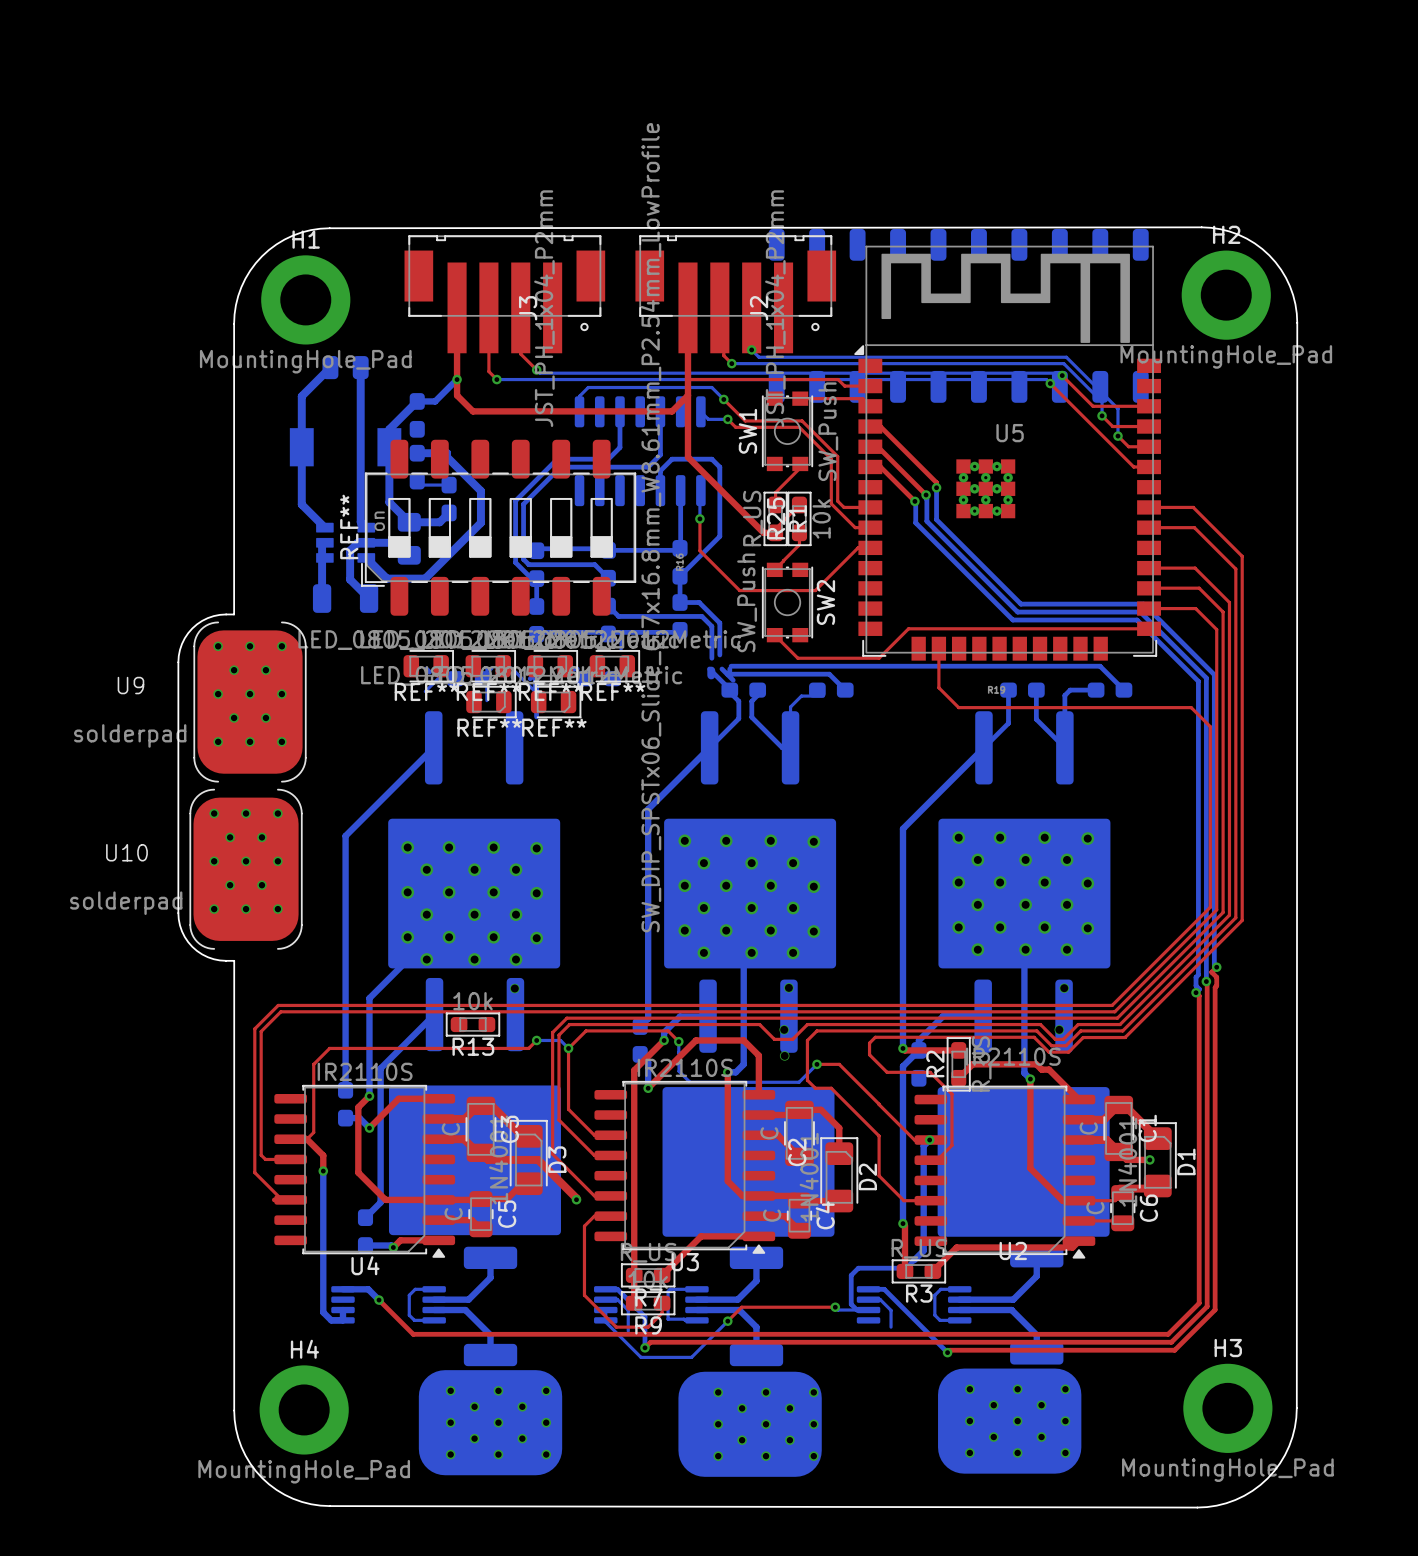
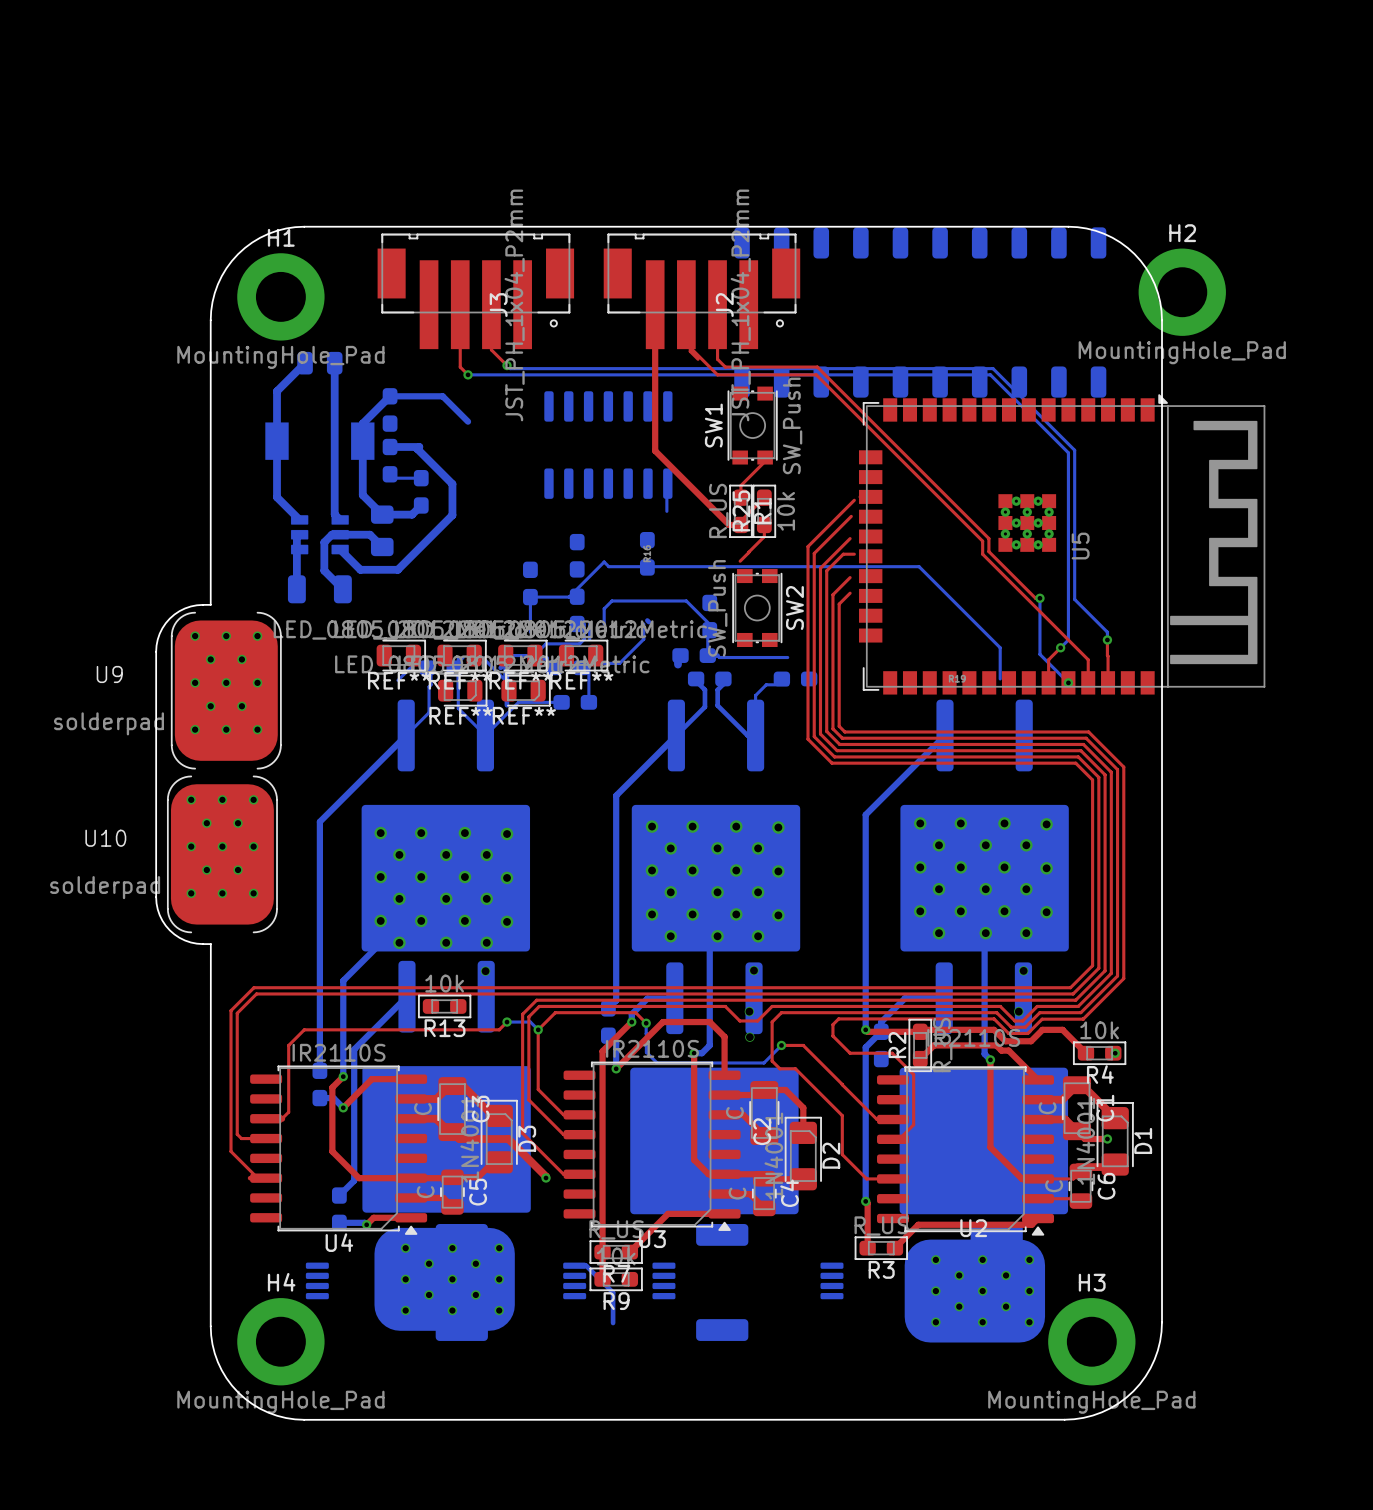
board edge: (329, 228) (1201, 227) (1220, 229) (1246, 238) (1262, 249) (1275, 262) (1285, 277) (1293, 295) (1297, 322) (1296, 1408) (1294, 1427) (1289, 1446) (1274, 1471) (1252, 1490) (1235, 1499) (1207, 1507) (329, 1506) (311, 1504) (293, 1498) (269, 1484) (255, 1471) (241, 1447) (234, 1419) (234, 960) -> (304, 226) (1068, 226) (1086, 228) (1104, 233) (1120, 242) (1140, 260) (1150, 276) (1157, 293) (1162, 320) (1162, 1322) (1160, 1341) (1154, 1359) (1139, 1384) (1118, 1403) (1092, 1415) (1074, 1419) (304, 1419) (286, 1418) (268, 1412) (244, 1398) (226, 1378) (214, 1353) (211, 1335) (210, 944)
top track: (457, 307) (457, 395) (472, 411) (672, 411) (687, 395) -> none
top track: none -> (717, 304) (717, 359) (725, 367) (817, 367) (988, 538) (988, 551) (1035, 598) (1039, 598)
bottom track: (751, 349) (759, 357) (1066, 357) (1117, 408) (1117, 436) -> none
via: (751, 349) -> none
bottom track: (731, 363) (1063, 363) (1102, 401) (1102, 415) -> none
via: (731, 363) -> none
bottom track: (1033, 373) (1059, 373) (1062, 375) -> (993, 368) (1074, 450) (1074, 599) (1107, 632) (1107, 639)
top track: (1062, 375) (1092, 406) (1149, 406) -> none
via: (1062, 375) -> none
bottom track: (457, 379) (435, 401) -> (468, 421) (442, 396) (407, 396)
via: (457, 379) -> none
top track: (687, 379) (751, 379) -> (686, 343) (717, 374)
top track: (838, 379) (844, 386) (870, 386) -> (802, 374) (816, 374) (982, 541) (982, 554) (1088, 659) (1088, 682)
bottom track: (1030, 379) (1046, 379) (1050, 383) -> (990, 374) (1068, 452) (1068, 639) (1060, 647)
top track: (1050, 383) (1133, 466) (1149, 466) -> none
via: (1050, 383) -> none
top track: (800, 398) (862, 398) (870, 406) -> none
top track: (723, 399) (745, 420) (802, 420) (837, 456) (837, 501) (843, 507) (870, 507) -> none
bottom track: (723, 399) (711, 387) (588, 387) (579, 396) (579, 411) -> none
via: (723, 399) -> none
bottom track: (619, 411) (619, 447) (608, 459) (557, 459) (515, 500) (515, 562) (531, 578) (536, 578) (536, 606) -> none
bottom track: (660, 411) (660, 454) (648, 467) (560, 467) (523, 504) (523, 559) (528, 564) (594, 564) (608, 578) (608, 606) (618, 616) (701, 616) (711, 626) (711, 658) -> none
bottom track: (700, 411) (708, 419) (727, 419) -> none
top track: (1102, 415) (1112, 426) (1149, 426) -> none
via: (1102, 415) -> none
top track: (727, 419) (735, 427) (799, 427) (831, 459) (831, 503) (855, 527) (870, 527) -> none
via: (727, 419) -> none
top track: (870, 426) (880, 426) (936, 482) (936, 487) -> none
top track: (1117, 436) (1128, 446) (1149, 446) -> none
via: (1117, 436) -> none
top track: (870, 446) (877, 446) (926, 495) -> none
U5 rotation: 0° (1007, 453) -> 90° clockwise (1062, 544)
top track: (870, 466) (880, 466) (914, 501) -> none
bottom track: (936, 487) (936, 519) (1020, 604) (1143, 604) (1214, 674) (1214, 964) (1216, 967) -> none
via: (936, 487) -> none
bottom track: (660, 490) (660, 470) (672, 459) (711, 459) (719, 467) (719, 536) (680, 576) (680, 602) (699, 602) (719, 623) (719, 654) -> none
bottom track: (680, 490) (681, 550) (538, 548) -> none
via: (926, 495) -> none
bottom track: (925, 498) (926, 521) (1017, 612) (1140, 612) (1206, 678) (1206, 981) -> none
bottom track: (914, 501) (915, 522) (1012, 620) (1137, 620) (1198, 681) (1198, 974) (1196, 977) (1196, 985) (1199, 989) (1196, 992) -> none
via: (914, 501) -> none
top track: (1149, 507) (1193, 507) (1242, 556) (1242, 920) (1166, 996) -> (850, 593) (839, 604) (839, 726) (844, 731) (1088, 731) (1123, 767) (1123, 978)
top track: (699, 518) (699, 550) (739, 590) (815, 590) (858, 547) (870, 547) -> none
via: (699, 518) -> none
REF**: SW_DIP_SPSTx06_Slide_6.7x16.8mm_W8.61mm_P2.54mm_LowProfile (498, 527) -> none
top track: (1149, 527) (1194, 527) (1235, 569) (1235, 917) (1160, 993) -> (850, 577) (832, 594) (832, 728) (842, 738) (1086, 738) (1117, 769) (1117, 975)
part: (536, 564) -> none
top track: (1149, 568) (1195, 568) (1229, 602) (1229, 915) (1153, 990) -> (854, 554) (843, 554) (826, 570) (826, 731) (839, 744) (1083, 744) (1111, 772) (1111, 973)
top track: (1149, 588) (1199, 588) (1223, 612) (1223, 912) (1147, 988) -> (850, 538) (820, 568) (820, 734) (837, 750) (1080, 750) (1105, 774) (1105, 970)
part: none -> (530, 583)
SW2 position: (787, 602) -> (757, 608)
bottom track: none -> (1039, 598) (1039, 654) (1068, 682)
via: none -> (1039, 598)
top track: (1149, 608) (1195, 608) (1216, 629) (1216, 909) (1141, 985) -> (851, 516) (814, 553) (814, 736) (834, 756) (1078, 756) (1098, 777) (1098, 968)
part: (680, 616) -> none
part: (536, 620) -> none
part: none -> (709, 616)
top track: (1149, 628) (908, 628) (879, 658) (797, 658) (774, 635) -> none
bottom track: (539, 632) (680, 632) (681, 633) -> none
bottom track: none -> (584, 623) (584, 639) (579, 643) (546, 643) (530, 659) (526, 655) (507, 655)
bottom track: none -> (643, 623) (643, 639) (619, 663) (588, 663) (588, 702)
bottom track: none -> (530, 632) (530, 597) (569, 597) (604, 562) (608, 566) (919, 566) (1000, 647) (1000, 678)
top track: (938, 648) (938, 687) (958, 707) (1191, 707) (1210, 726) (1210, 907) (1134, 982) -> (854, 500) (808, 546) (808, 739) (831, 763) (1075, 763) (1092, 780) (1092, 965)
top track: none -> (1107, 639) (1108, 682)
via: none -> (1107, 639)
top track: none -> (1060, 647) (1048, 659) (1048, 682)
via: none -> (1060, 647)
part: none -> (694, 655)
bottom track: (731, 666) (741, 666) -> (604, 623) (604, 608) (611, 600) (686, 600) (709, 624) (707, 655)
bottom track: (751, 666) (1100, 666) (1123, 690) -> (717, 655) (719, 657) (787, 657)
bottom track: (426, 669) (429, 672) -> none
bottom track: (709, 669) (725, 684) -> none
bottom track: (721, 669) (733, 680) -> none
bottom track: (729, 669) (729, 671) -> none
bottom track: none -> (431, 663) (429, 712) (406, 735) (403, 732)
bottom track: none -> (458, 663) (458, 708) (485, 735)
bottom track: (727, 674) (829, 674) (845, 690) -> none
bottom track: (1008, 690) (1008, 723) (983, 747) -> none
part: (1022, 690) -> none
bottom track: (1036, 690) (1036, 719) (1064, 747) -> none
bottom track: (1096, 690) (1070, 690) (1064, 695) (1064, 737) -> none
part: (1110, 690) -> none
via: none -> (1068, 682)
bottom track: none -> (561, 702) (518, 702) (485, 735)
part: none -> (575, 702)
top track: (1216, 967) (1211, 972) (1216, 977) (1215, 987) (1215, 1309) (1174, 1350) (949, 1350) (947, 1352) -> none
via: (1216, 967) -> none
top track: (1206, 981) (1207, 1306) (1171, 1342) (650, 1342) (644, 1347) -> none
via: (1206, 981) -> none
top track: (1196, 992) (1199, 995) (1199, 1303) (1168, 1334) (413, 1334) (379, 1300) -> none
via: (1196, 992) -> none
top track: none -> (922, 1029) (994, 1029) (1005, 1041) (1031, 1041) (1042, 1029) (1062, 1029) (1085, 1053)
R4: none -> 10k (1099, 1053)
via: none -> (1115, 1053)
top track: (306, 1139) (323, 1155) (323, 1171) -> none
bottom track: (929, 1140) (923, 1145) (923, 1250) (906, 1268) (858, 1268) (851, 1275) (851, 1304) (856, 1310) (868, 1310) (838, 1310) (835, 1307) -> none
via: (929, 1140) -> none
bottom track: (323, 1171) (323, 1312) (331, 1320) (342, 1320) (342, 1310) -> none
via: (323, 1171) -> none
top track: (610, 1216) (594, 1216) (584, 1226) (584, 1295) (616, 1327) (648, 1327) (662, 1313) (662, 1303) -> none
bottom track: (1036, 1256) (1036, 1276) (1013, 1299) (959, 1299) -> none
bottom track: (490, 1257) (490, 1277) (468, 1299) (434, 1299) -> none
bottom track: (756, 1257) (756, 1280) (737, 1299) (696, 1299) -> none
bottom track: (342, 1289) (368, 1289) (380, 1301) -> none
bottom track: (434, 1289) (415, 1289) (409, 1295) (409, 1315) (414, 1320) (434, 1320) -> none
bottom track: (696, 1289) (670, 1289) (668, 1291) (668, 1319) (696, 1320) -> none
bottom track: (868, 1289) (884, 1289) (947, 1352) -> none
bottom track: (959, 1289) (940, 1289) (934, 1295) (934, 1315) (940, 1320) (959, 1320) -> none
bottom track: (605, 1299) (617, 1299) (628, 1310) (628, 1331) -> none
bottom track: (868, 1299) (880, 1299) (891, 1310) (891, 1327) -> none
via: (379, 1300) -> none
top track: (835, 1307) (741, 1307) (727, 1321) -> none
via: (835, 1307) -> none
bottom track: (434, 1310) (465, 1310) (490, 1335) (490, 1355) -> none
bottom track: (605, 1310) (605, 1322) (641, 1357) (691, 1357) (727, 1321) -> none
bottom track: (696, 1310) (739, 1310) (756, 1327) (756, 1355) -> none
bottom track: (959, 1310) (1011, 1310) (1036, 1335) (1036, 1353) -> none
via: (727, 1321) -> none
via: (644, 1347) -> none
via: (947, 1352) -> none
H3 position: (1227, 1408) -> (1091, 1341)
H4 position: (304, 1409) -> (280, 1341)
part position: (1009, 1421) -> (974, 1291)
part position: (490, 1422) -> (444, 1279)
part: (750, 1424) -> none

